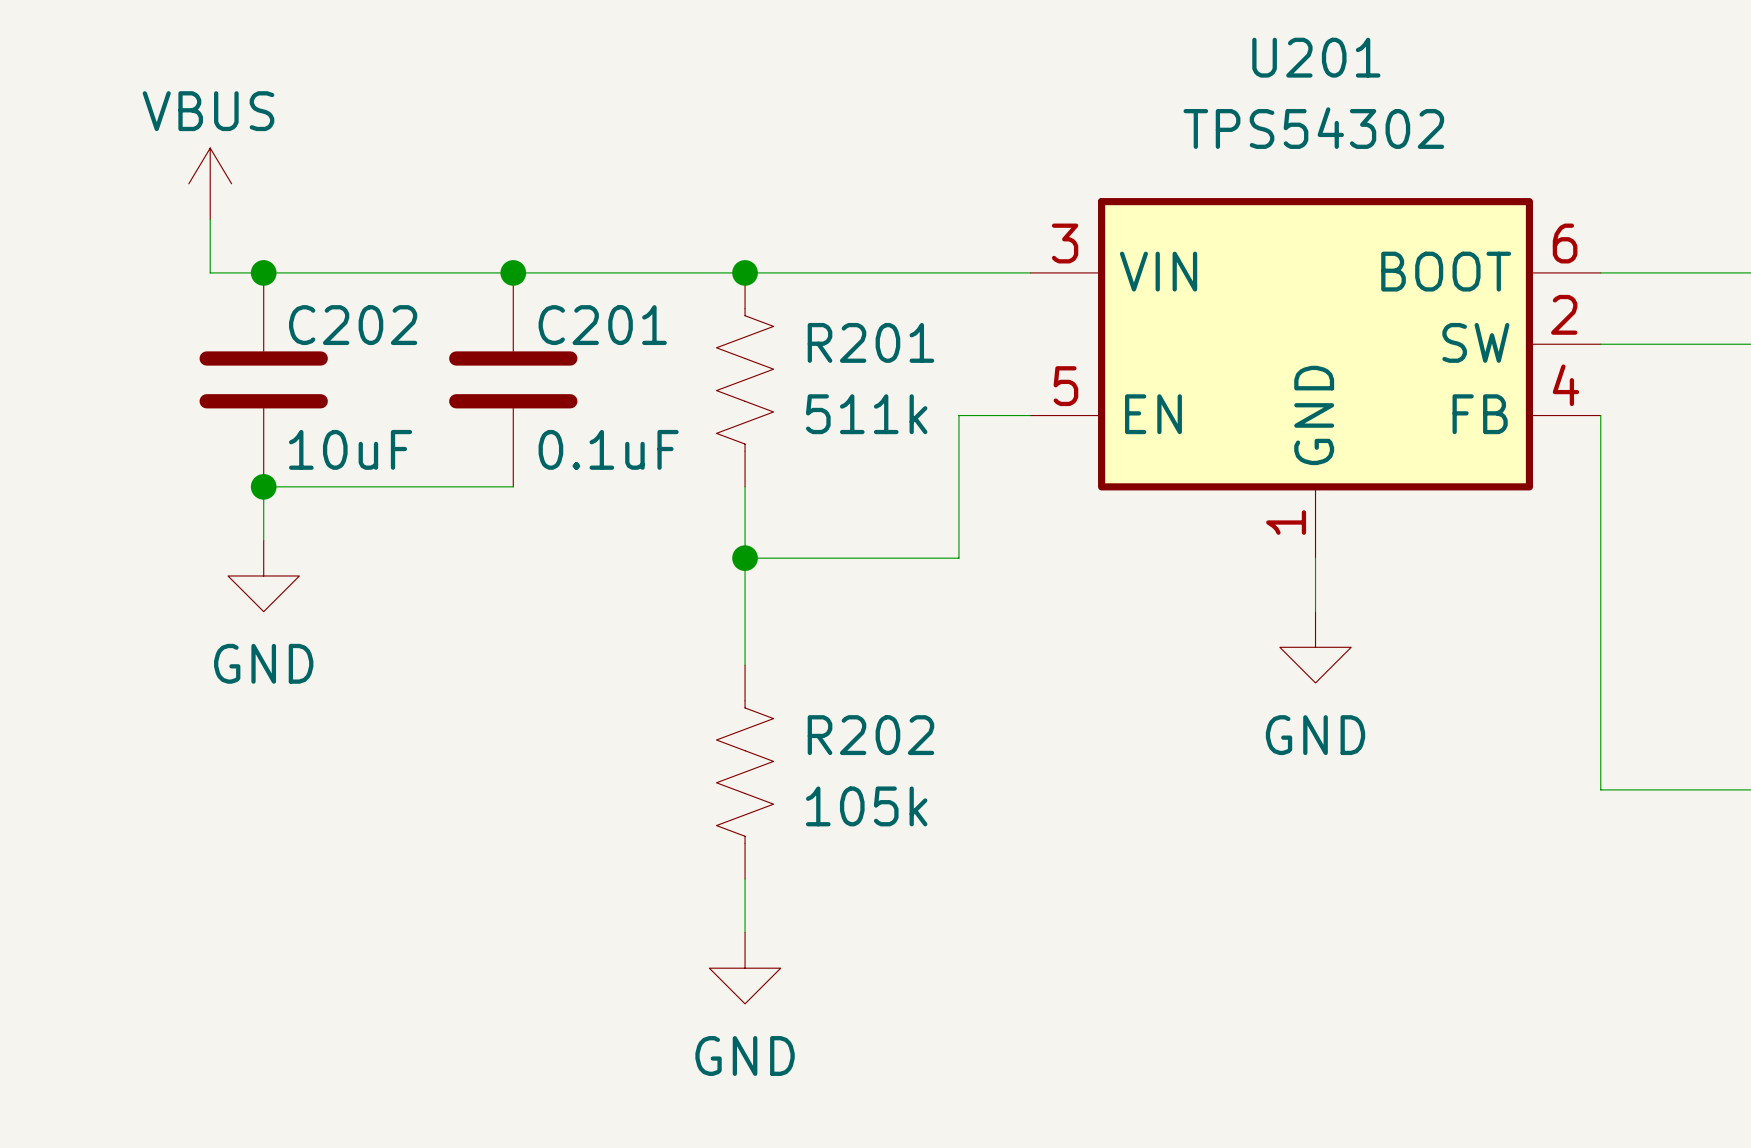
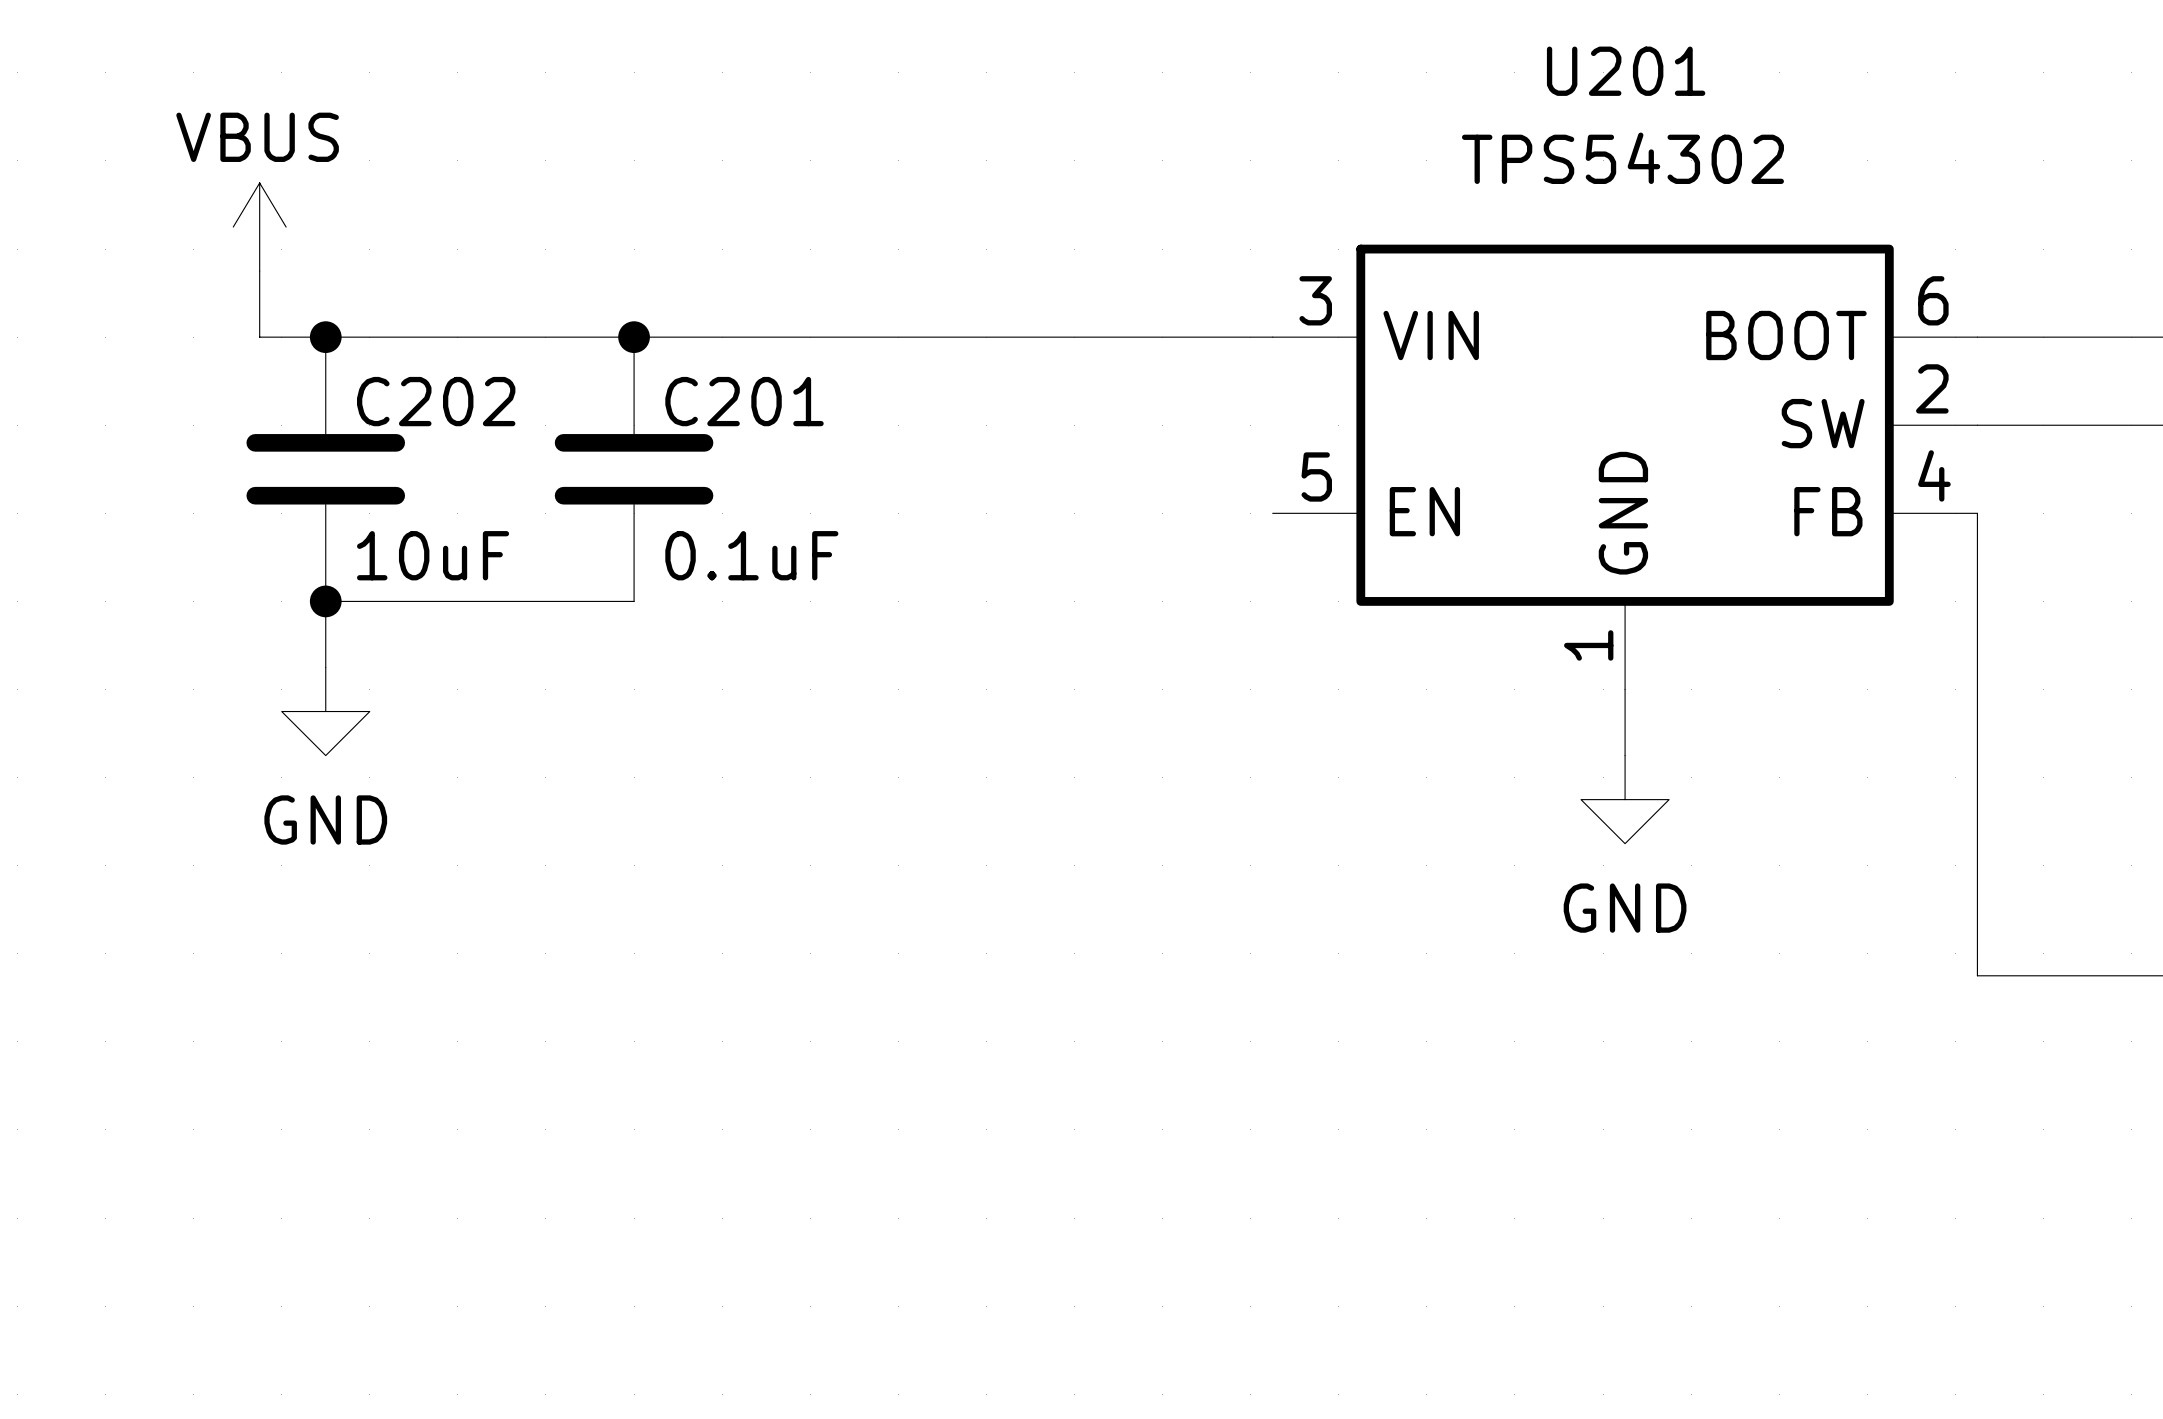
junction: (745, 272) -> none
R201: 511k (745, 379) -> none
wire: (1030, 415) (958, 415) (958, 558) (745, 558) -> none
wire: (745, 486) (745, 665) -> none
junction: (745, 558) -> none
R202: 105k (745, 772) -> none
wire: (745, 879) (745, 932) -> none
power symbol: GND (745, 968) -> none

